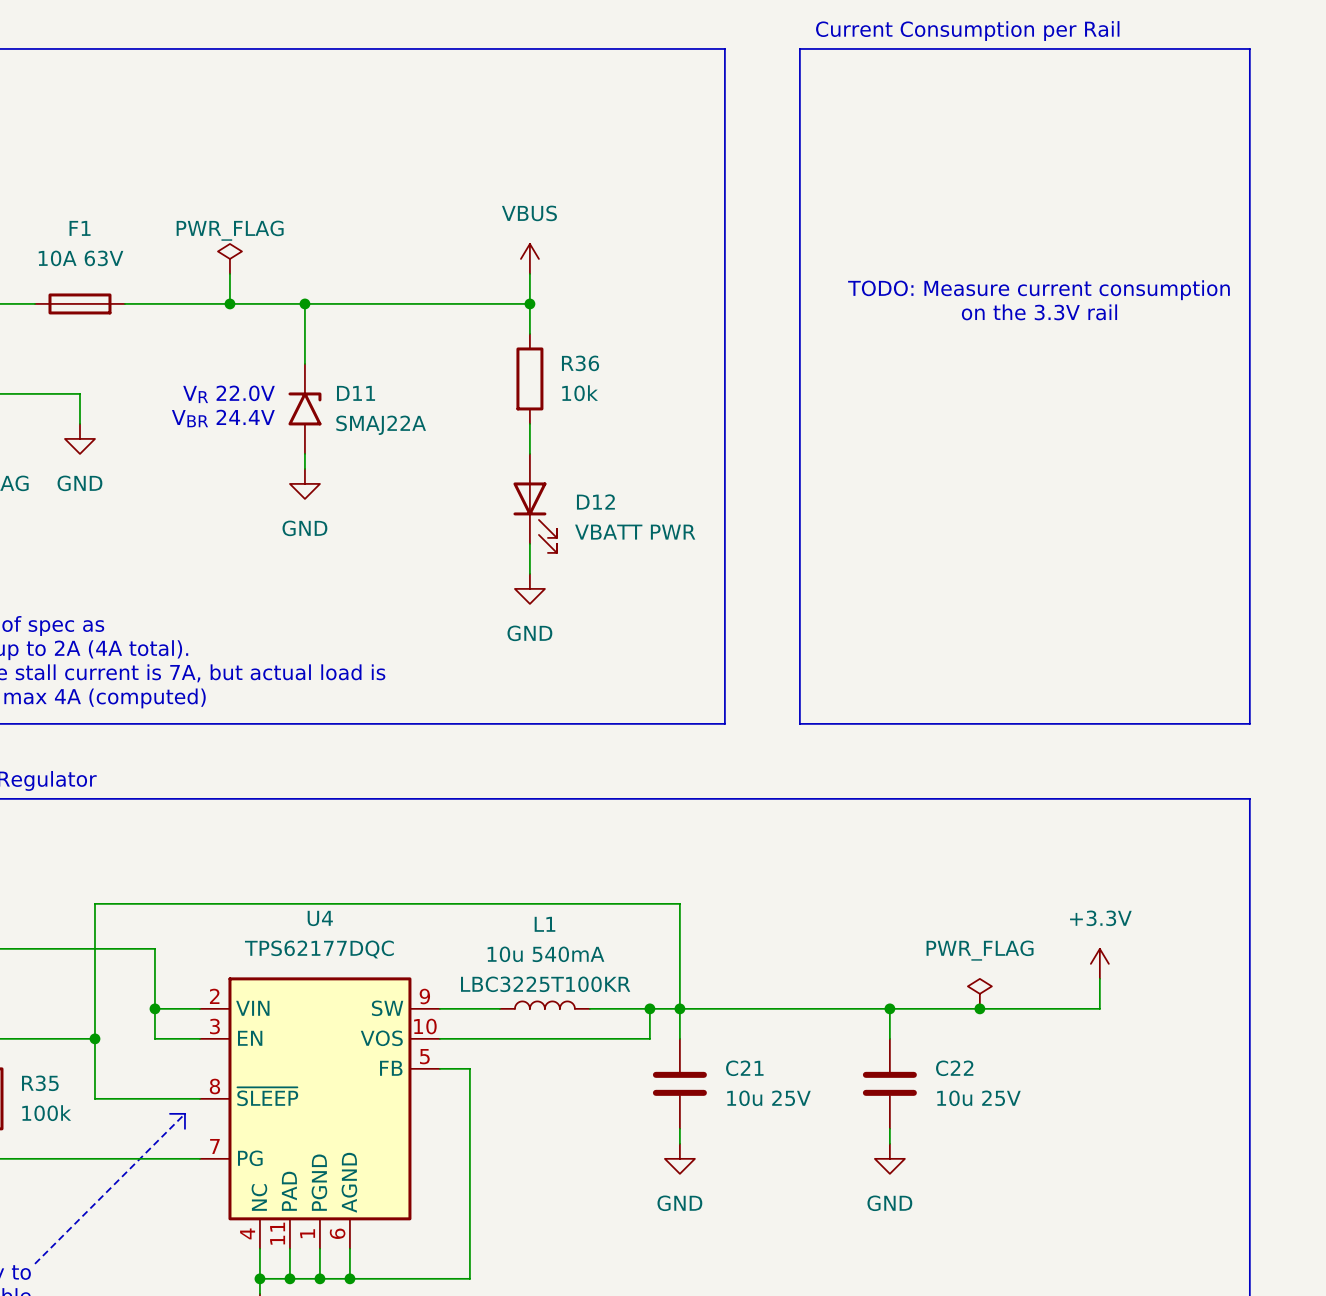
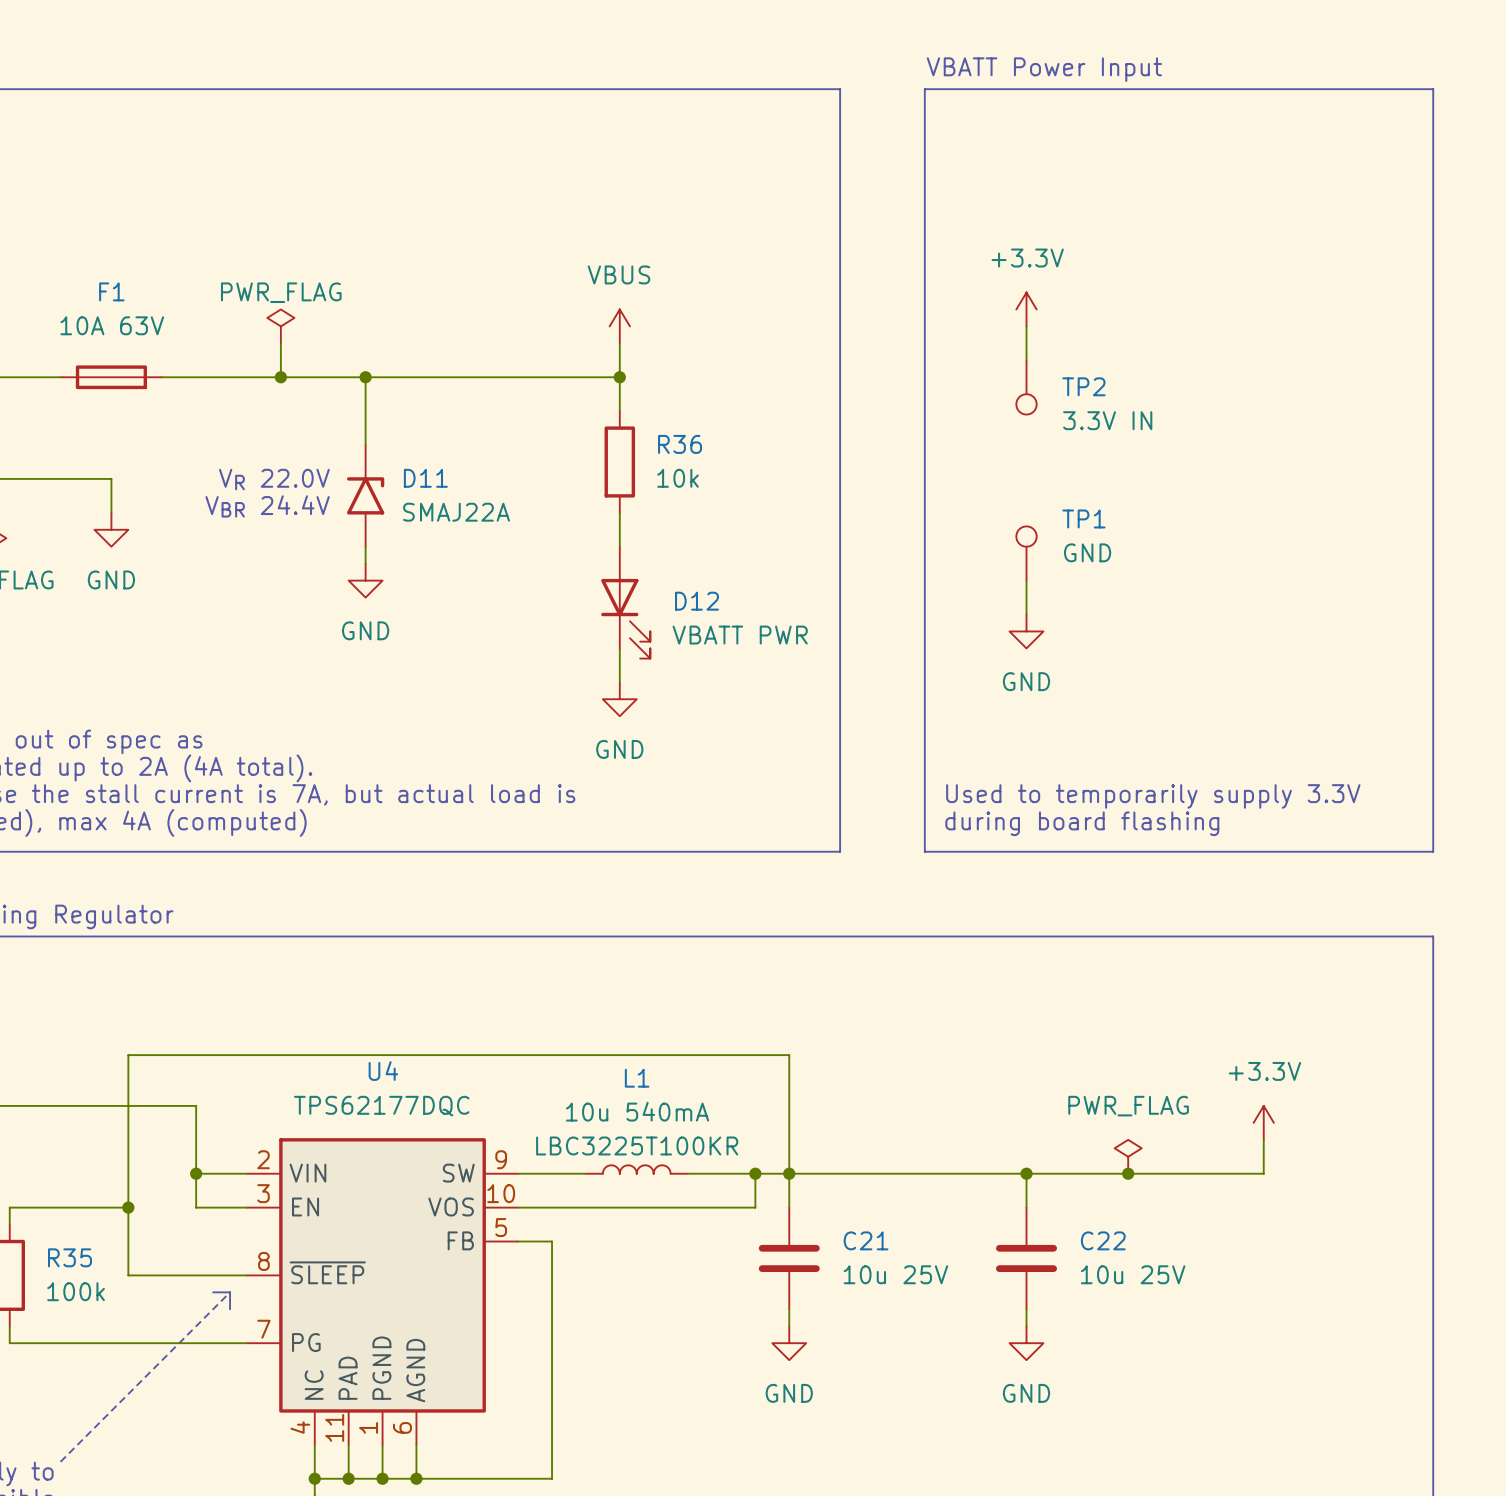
text: none -> VBATT Power Input (1044, 69)
text: Current Consumption per Rail (967, 31) -> none
power symbol: none -> +3.3V (1026, 309)
wire: none -> (1026, 326) (1026, 360)
text: TODO: Measure current consumption (1038, 290) -> none
TP2: none -> 3.3V IN (1026, 387)
text: on the 3.3V rail (1039, 312) -> none
TP1: none -> GND (1026, 553)
wire: none -> (1026, 580) (1026, 614)
power symbol: none -> GND (1026, 631)
text: none -> Used to temporarily supply 3.3V (1153, 796)
text: none -> during board flashing (1082, 823)

